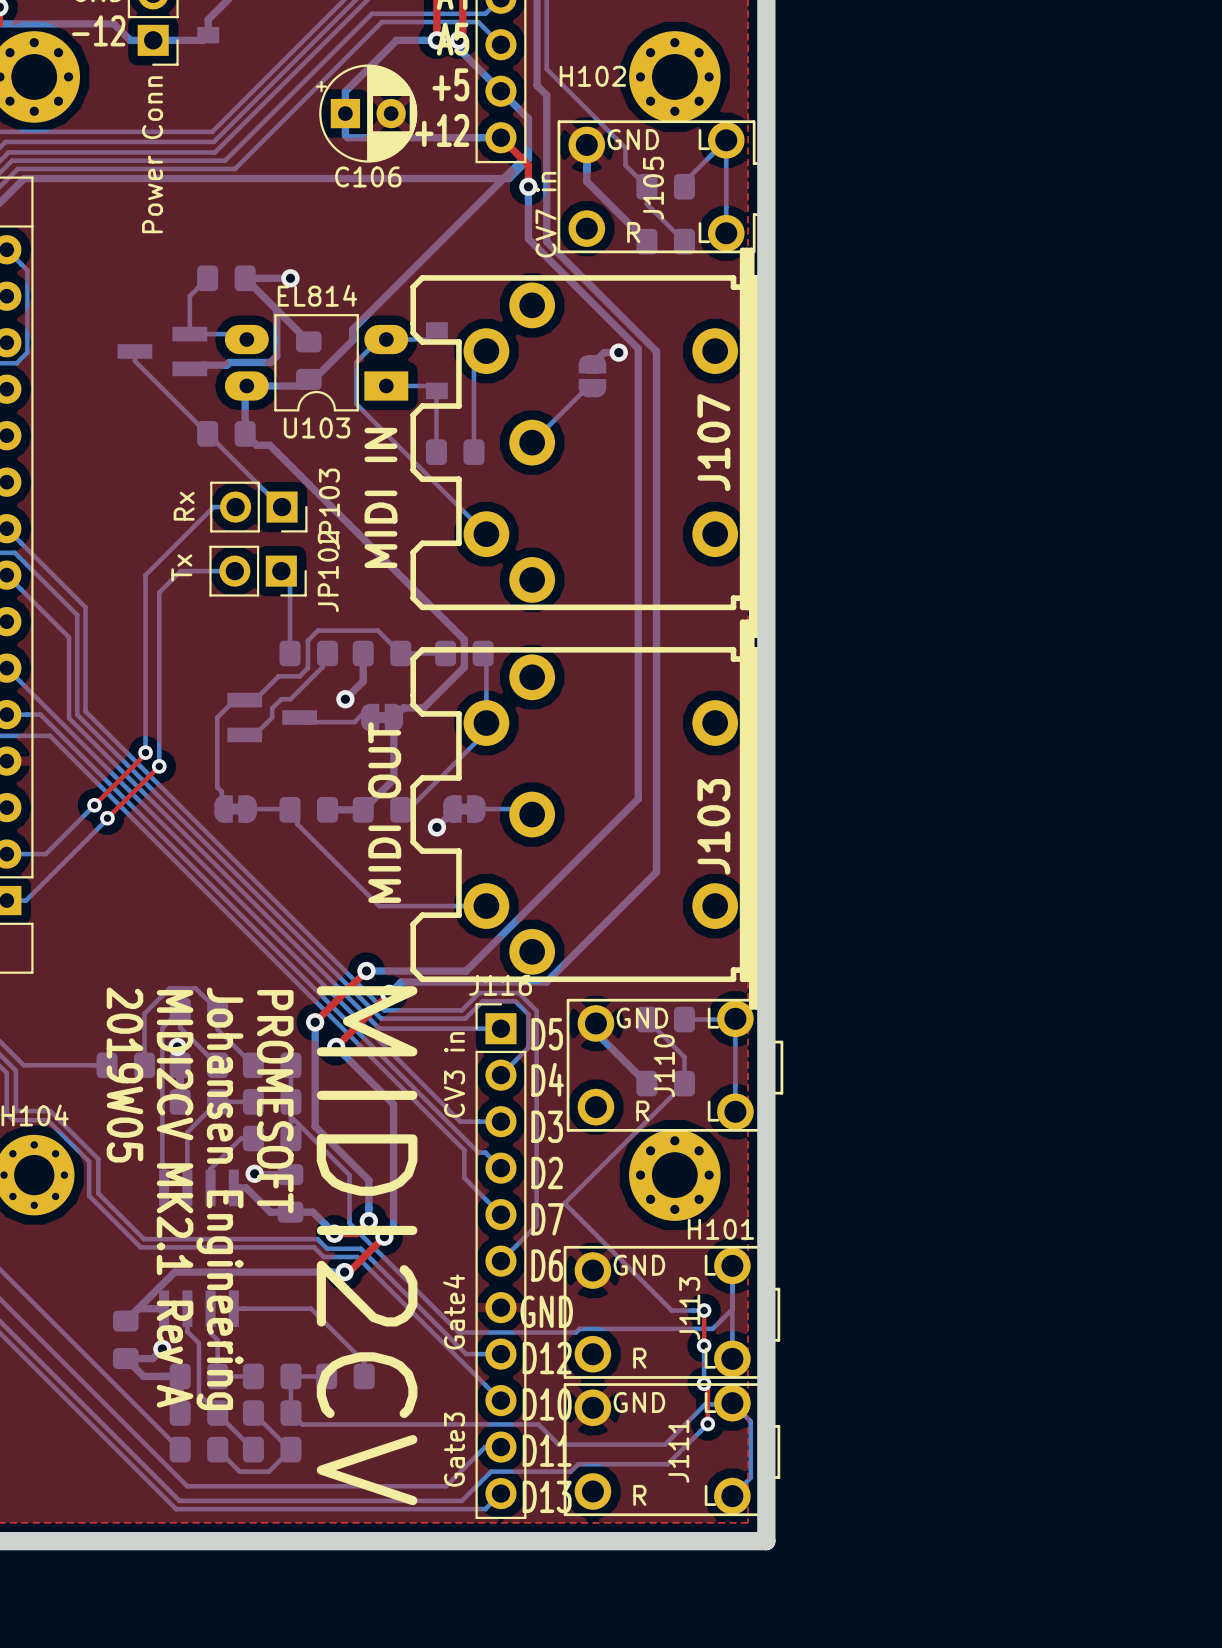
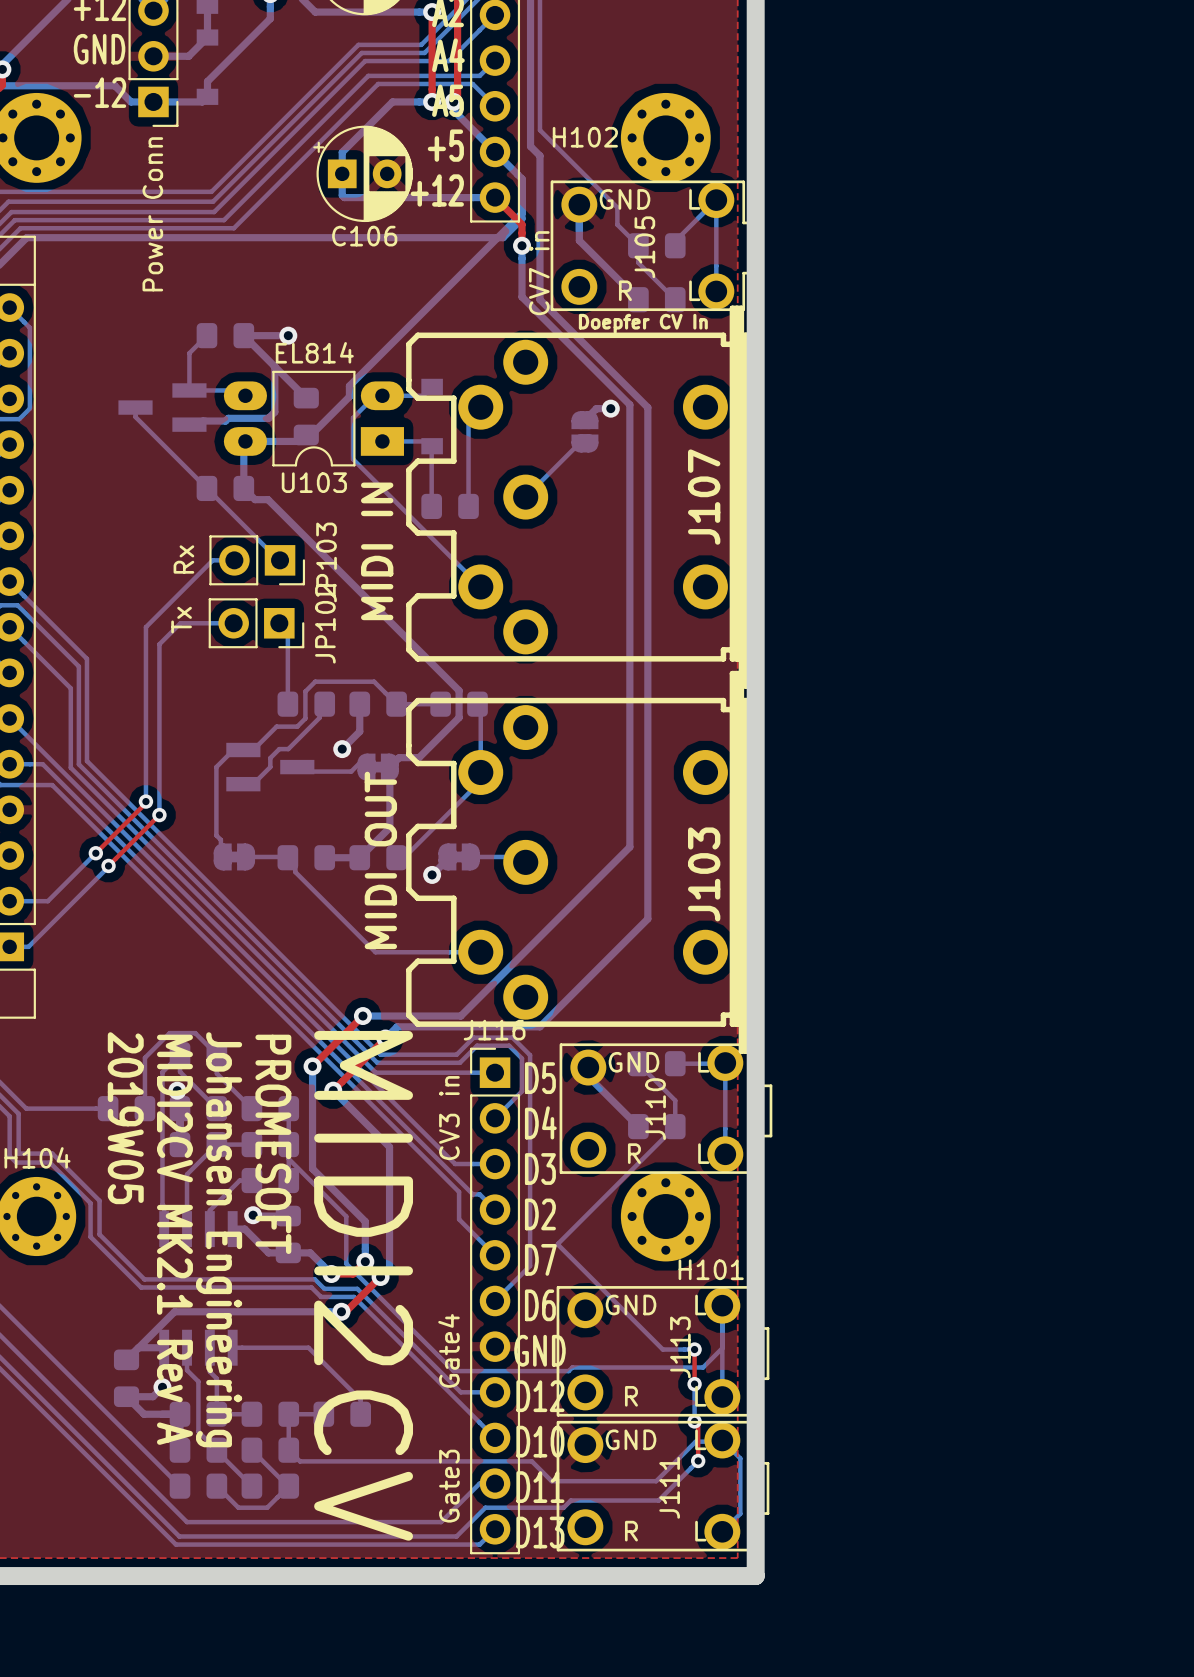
text: none -> Doepfer CV In (643, 323)

